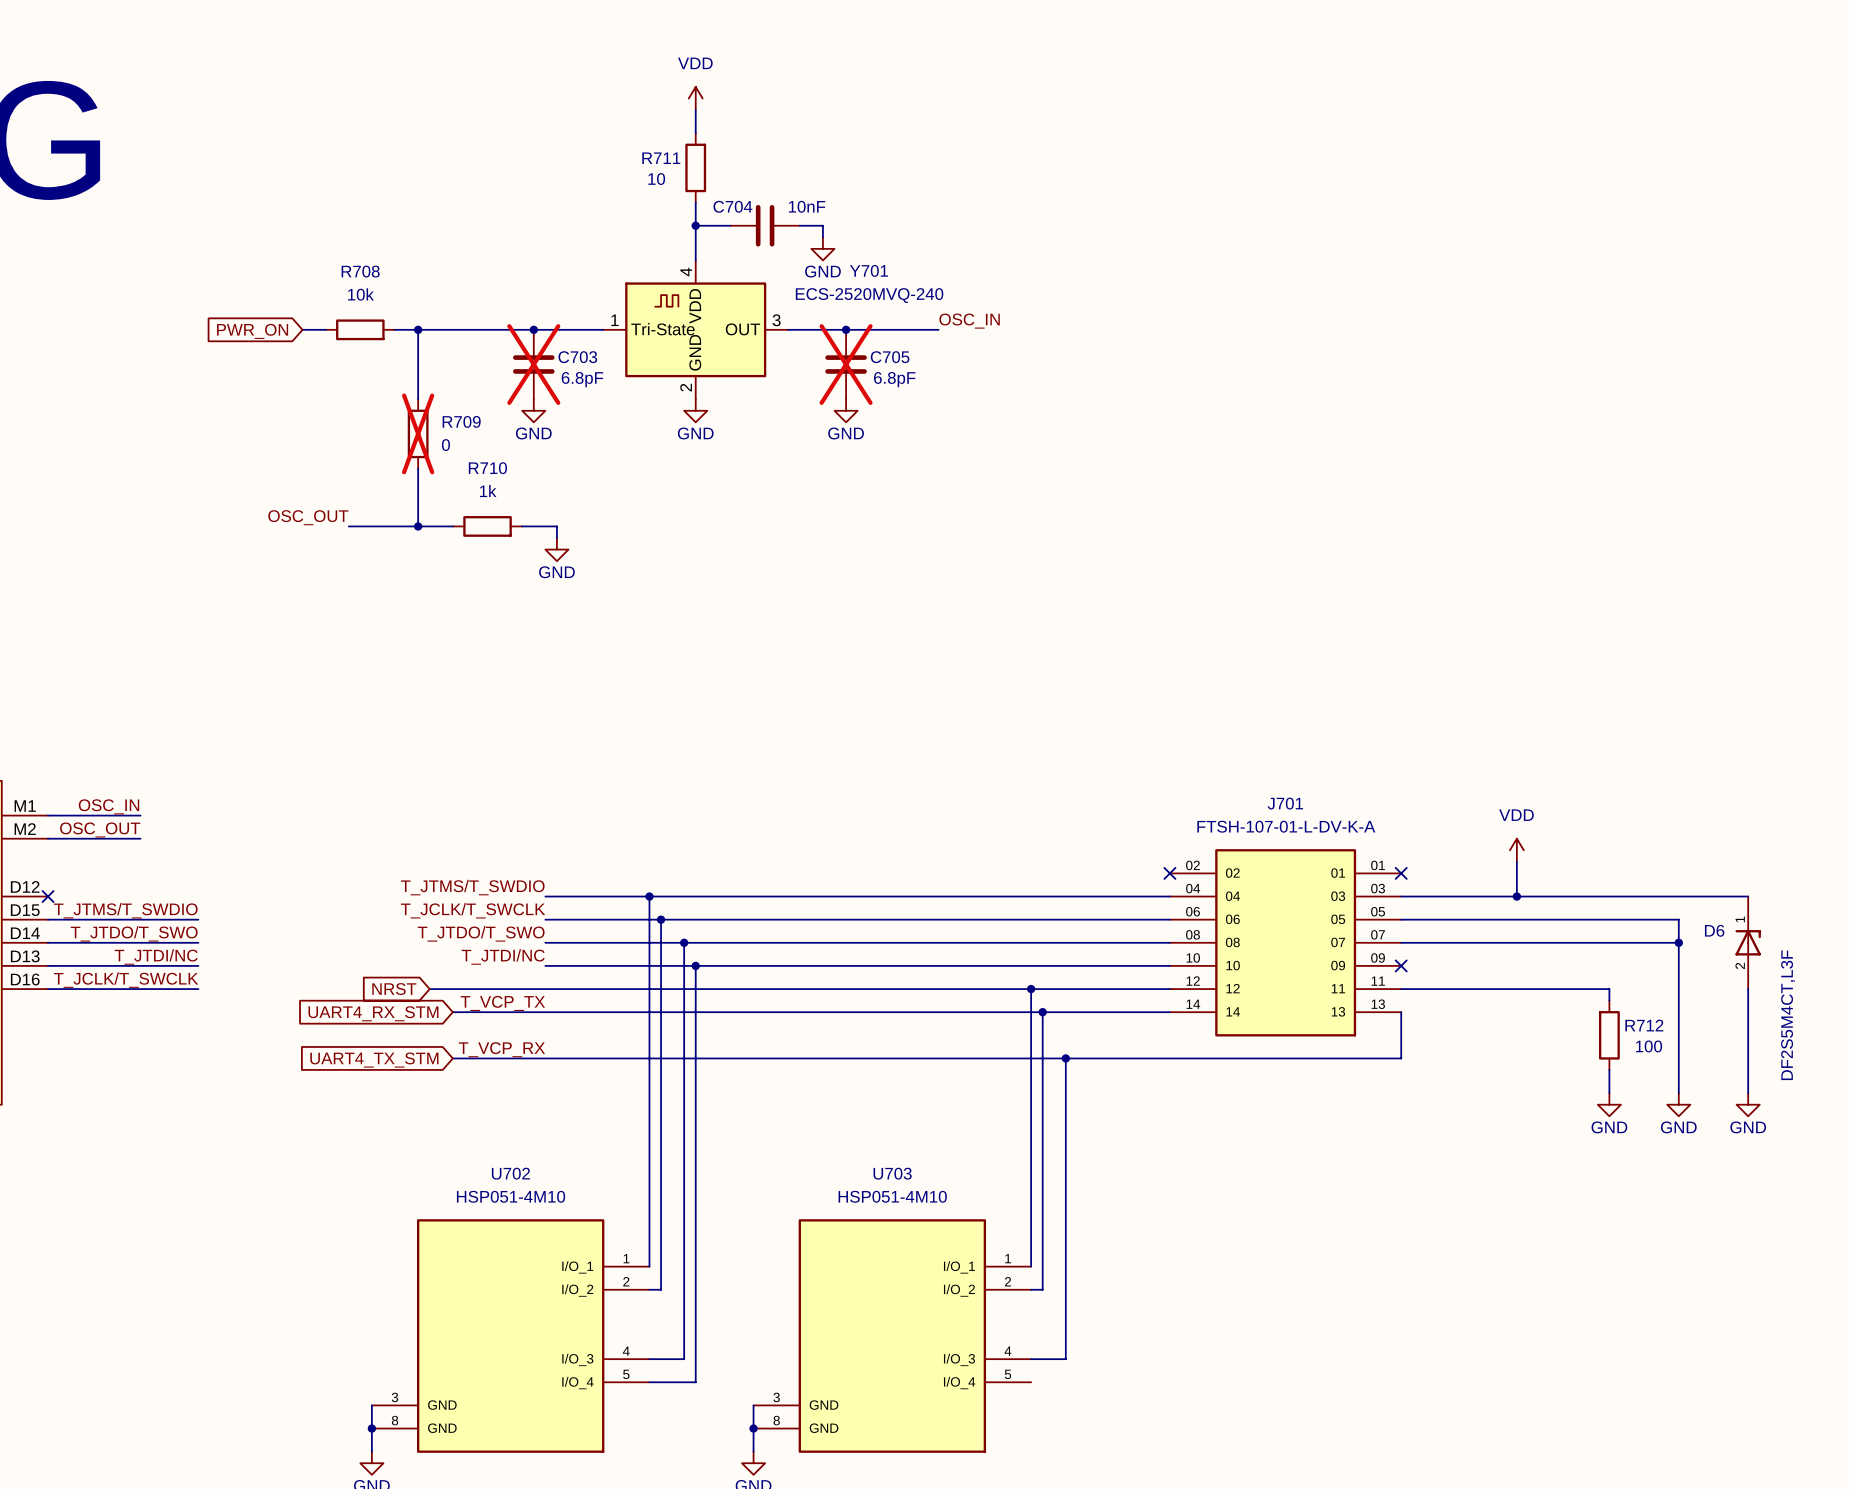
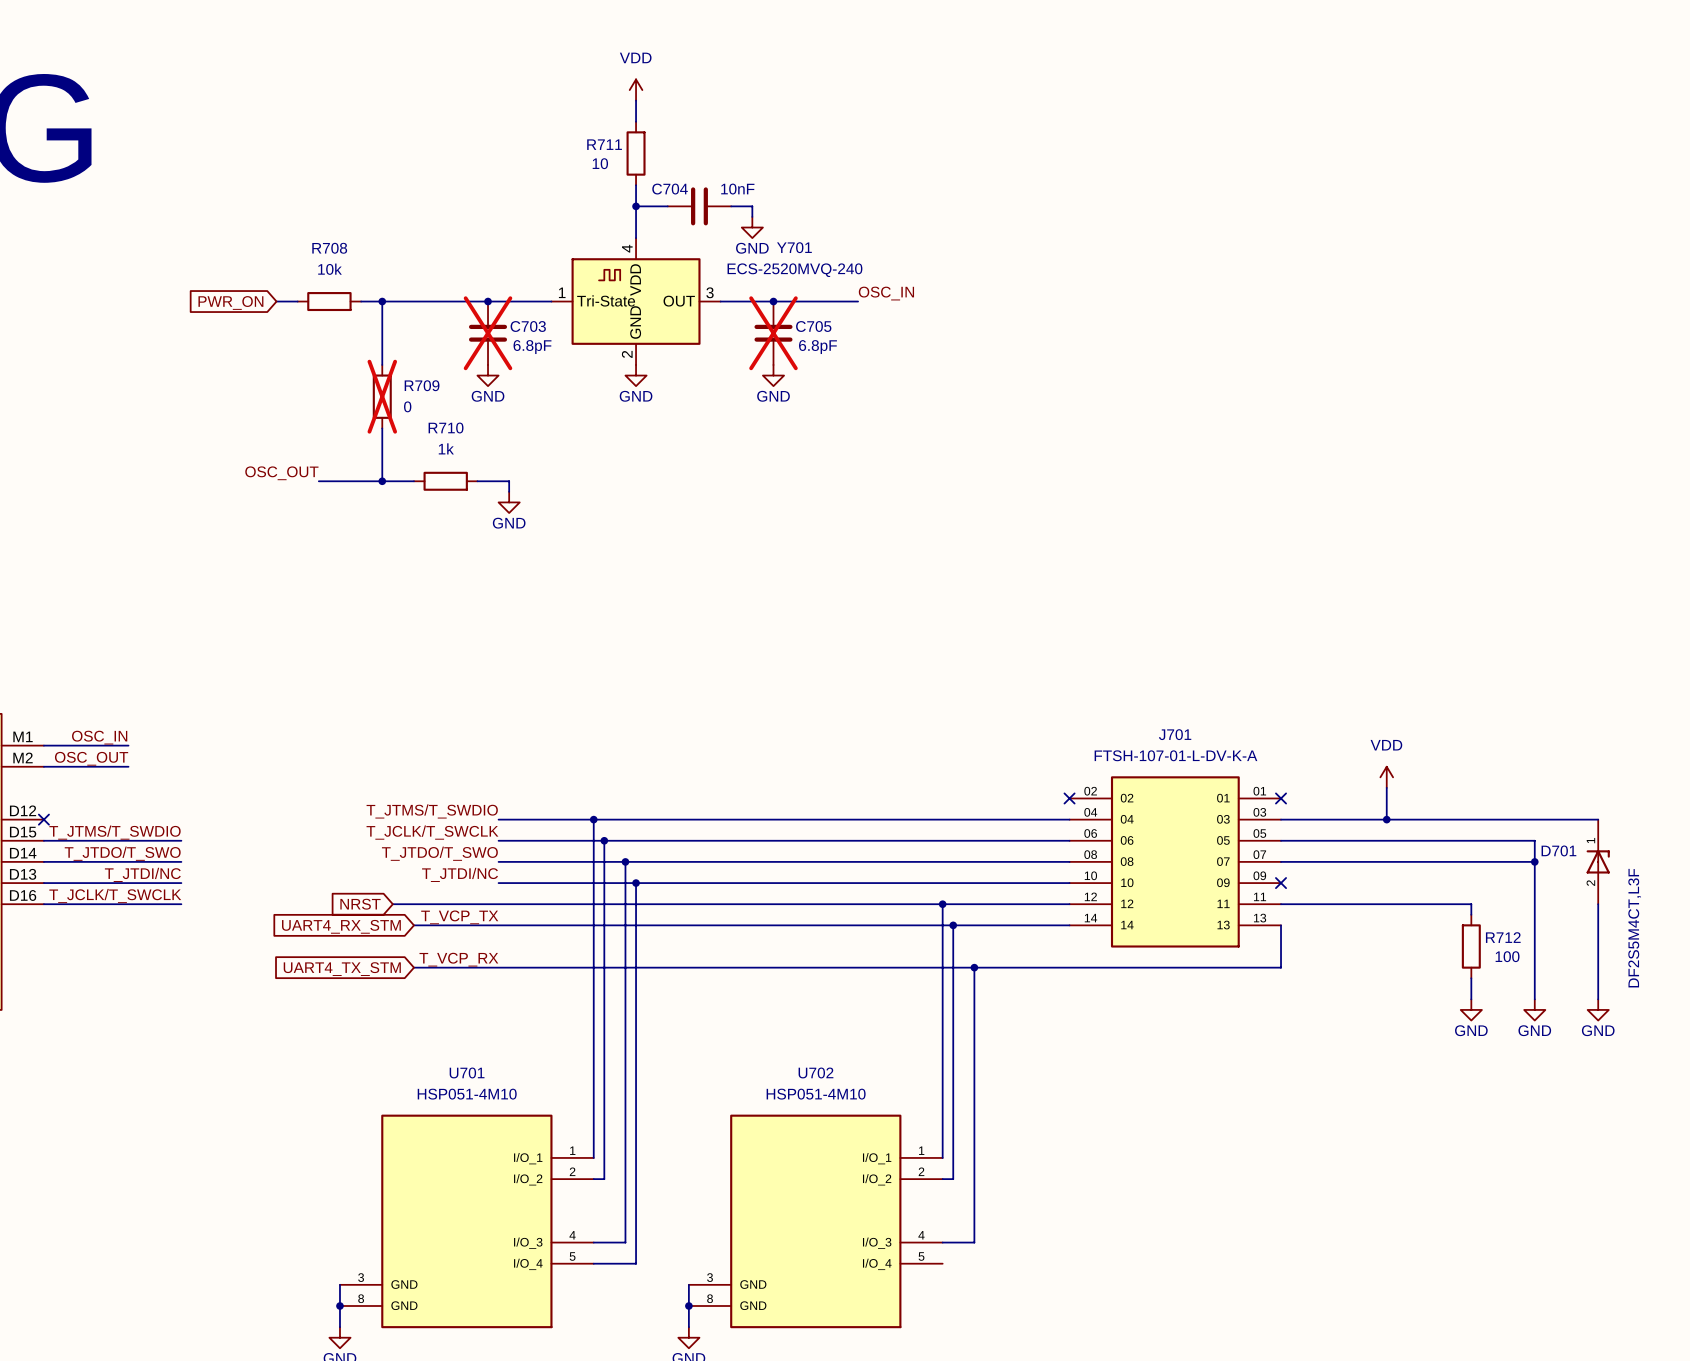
D6 name: D6 (1714, 930) -> D701 (1558, 850)
U702 name: U702 (510, 1173) -> U701 (467, 1072)
U703 name: U703 (892, 1173) -> U702 (815, 1072)

